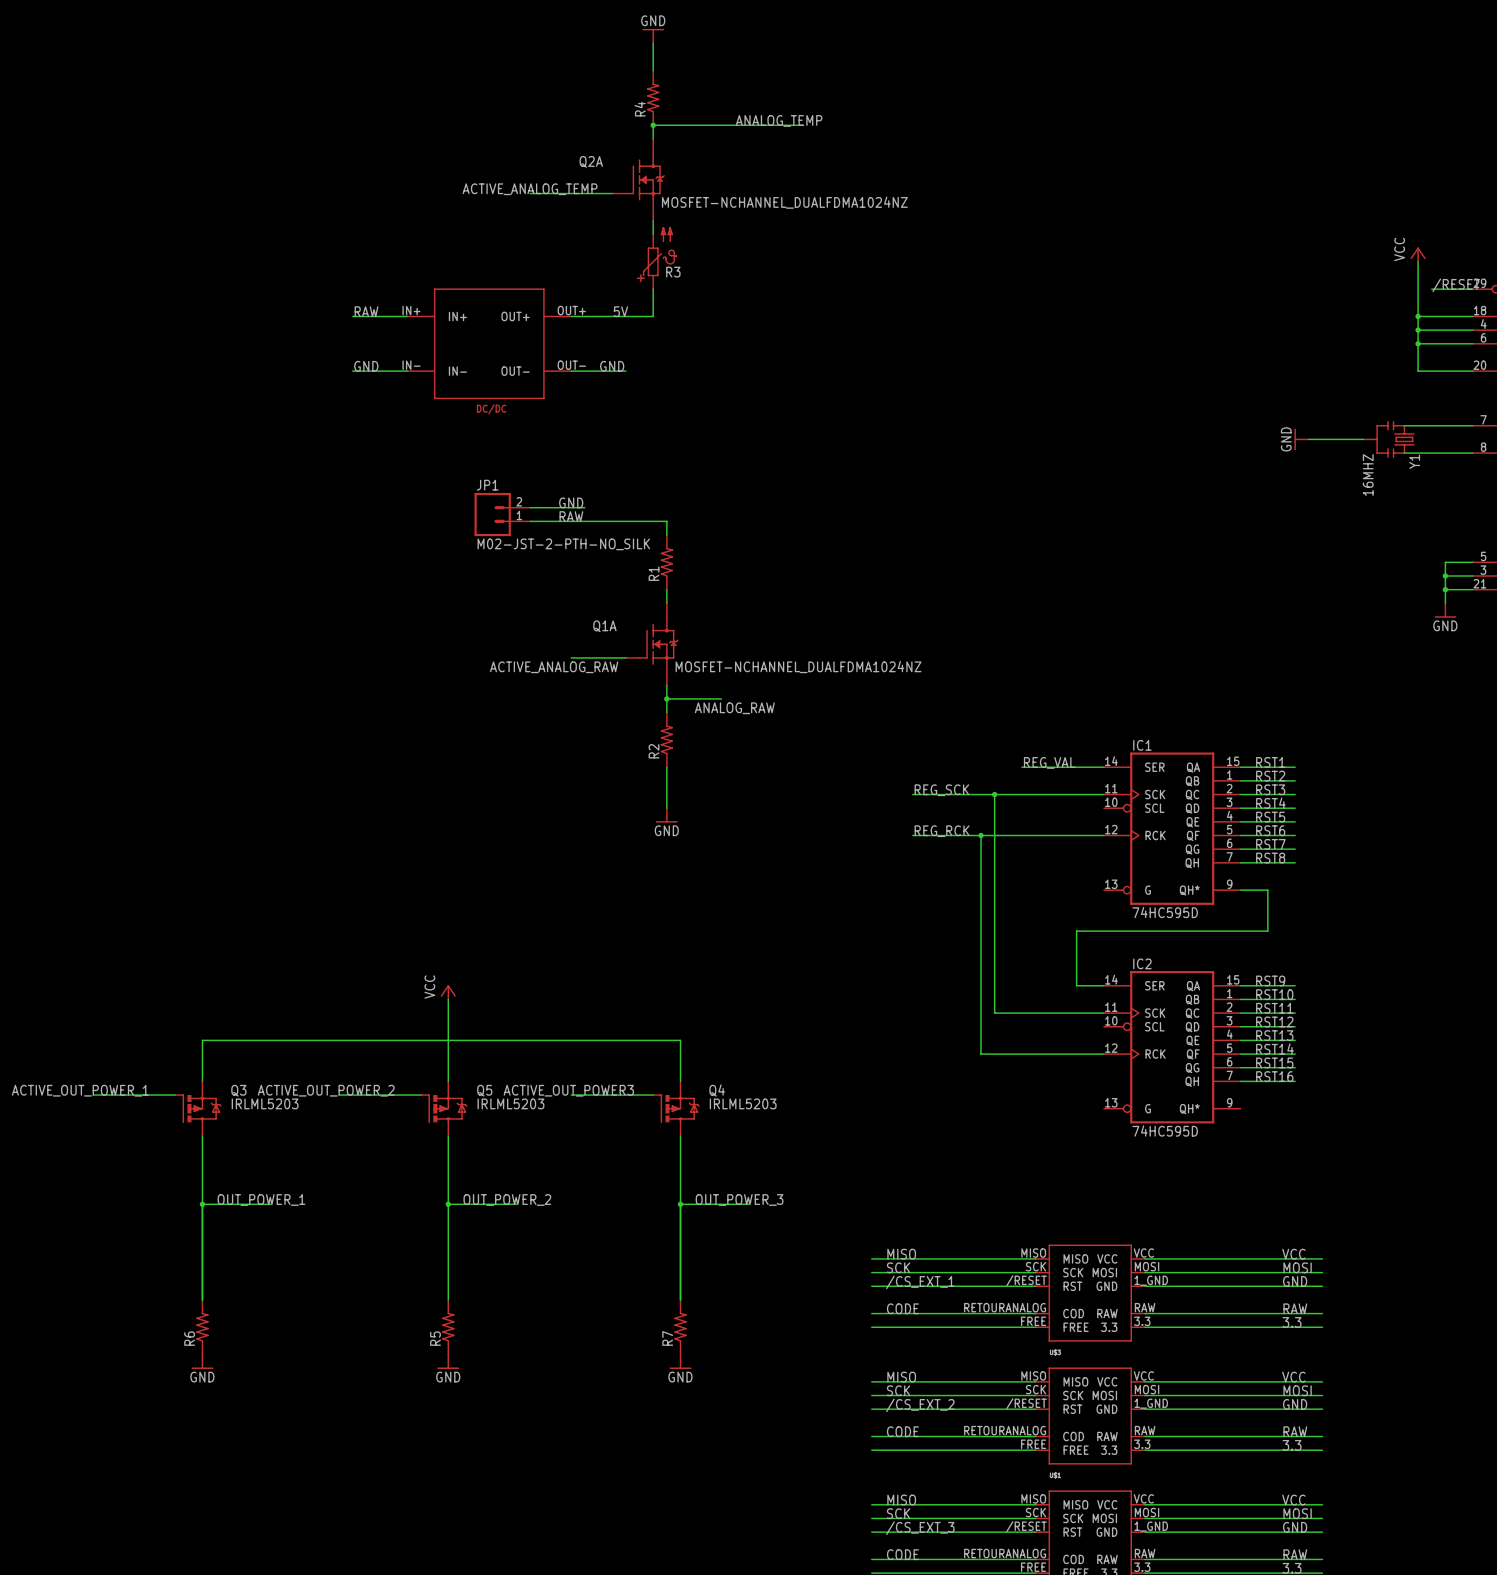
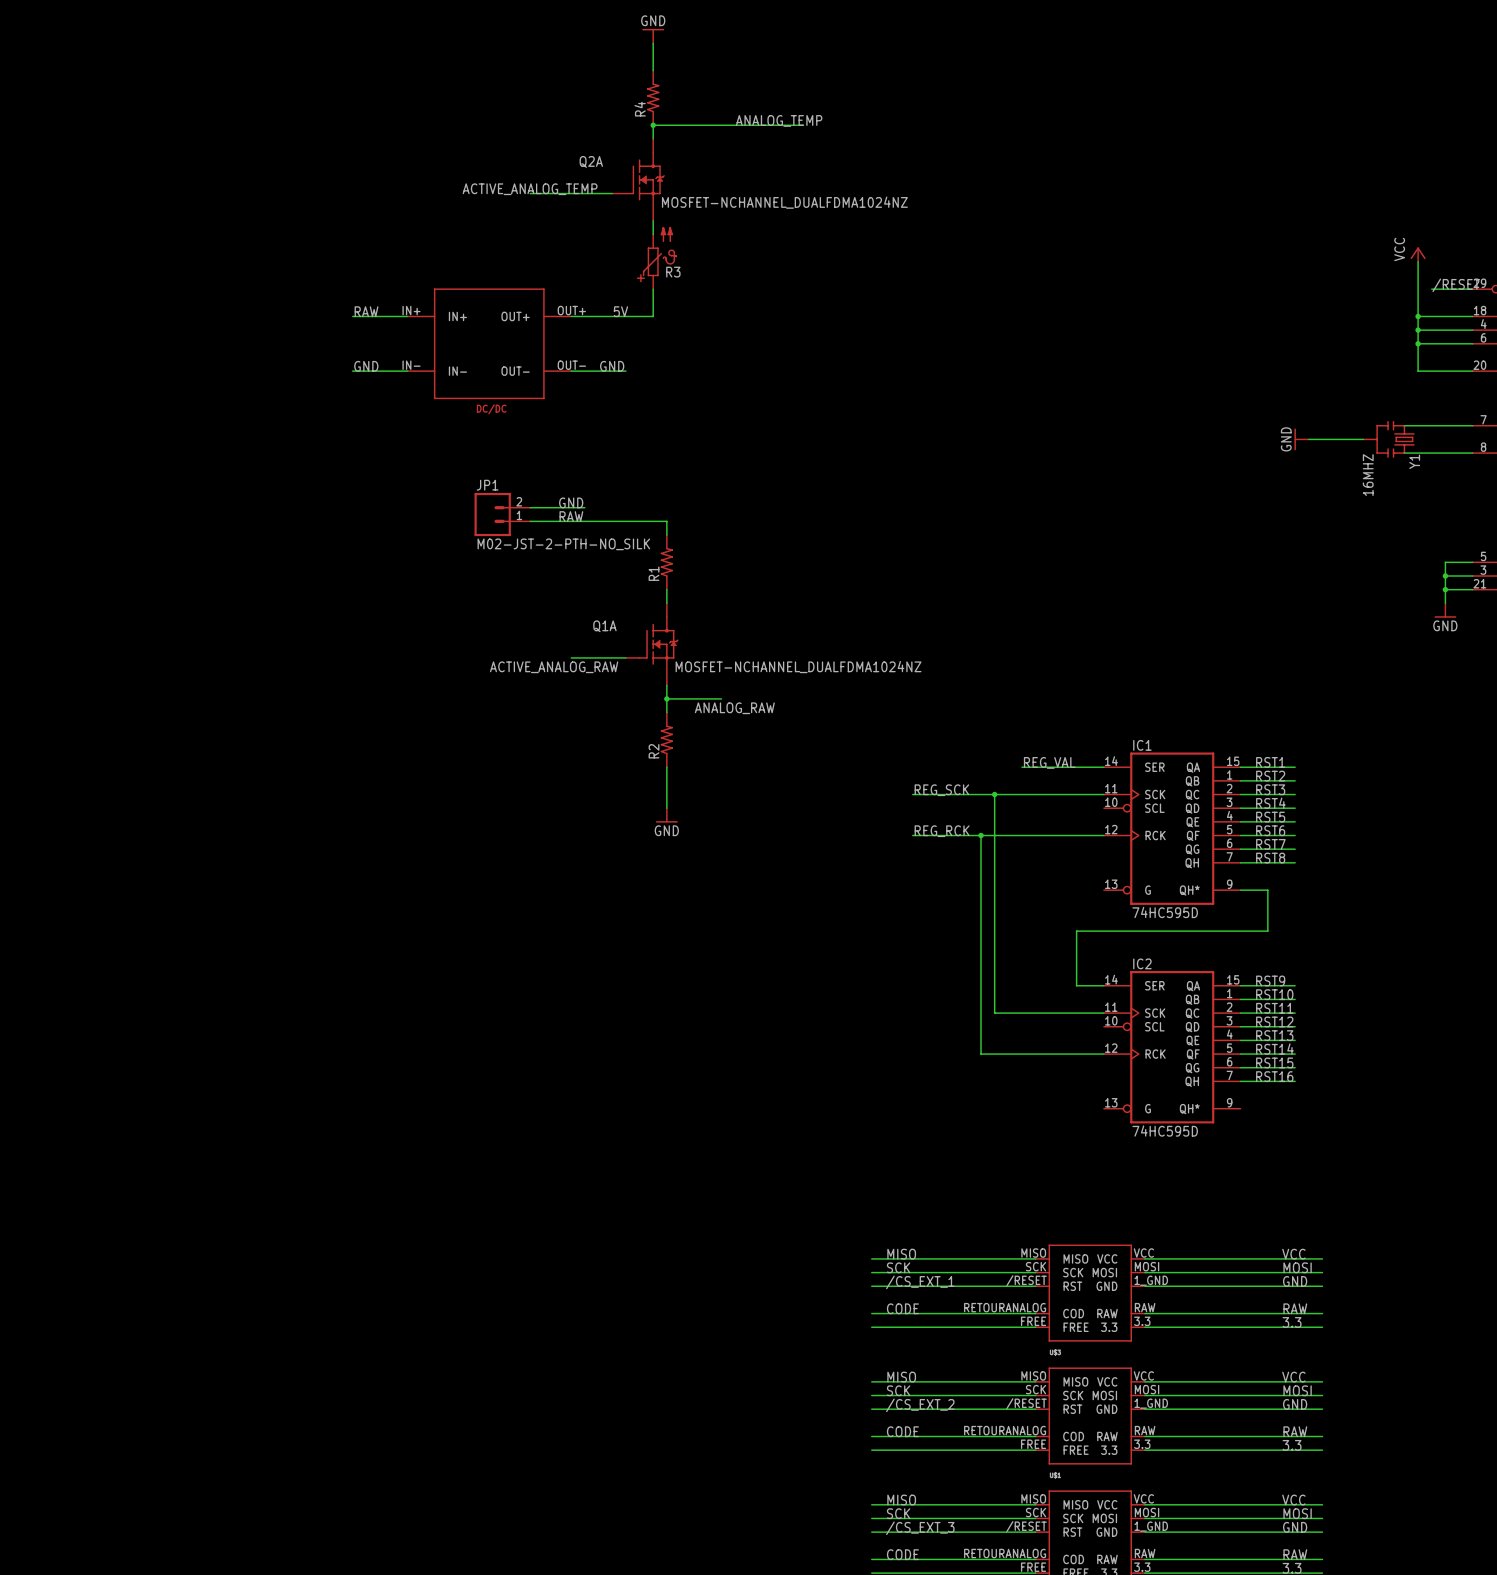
power symbol: VCC (448, 992) -> none
wire: (448, 999) (448, 1081) -> none
wire: (202, 1081) (202, 1040) (680, 1040) (680, 1081) -> none
label: ACTIVE_OUT_POWER_1 (80, 1090) -> none
label: ACTIVE_OUT_POWER_2 (326, 1090) -> none
label: ACTIVE_OUT_POWER3 (568, 1090) -> none
wire: (93, 1095) (175, 1095) -> none
wire: (339, 1095) (420, 1095) -> none
wire: (571, 1095) (653, 1095) -> none
Q3: IRLML5203 (198, 1108) -> none
Q5: IRLML5203 (443, 1108) -> none
Q4: IRLML5203 (676, 1108) -> none
wire: (202, 1136) (202, 1299) -> none
wire: (448, 1136) (448, 1299) -> none
wire: (680, 1136) (680, 1299) -> none
label: OUT_POWER_1 (261, 1199) -> none
label: OUT_POWER_2 (507, 1199) -> none
label: OUT_POWER_3 (739, 1199) -> none
wire: (202, 1204) (270, 1204) -> none
junction: (202, 1204) -> none
wire: (448, 1204) (516, 1204) -> none
junction: (448, 1204) -> none
wire: (680, 1204) (748, 1204) -> none
junction: (680, 1204) -> none
R6: (202, 1327) -> none
R5: (448, 1327) -> none
R7: (680, 1327) -> none
power symbol: GND (202, 1361) -> none
power symbol: GND (448, 1361) -> none
power symbol: GND (680, 1361) -> none

